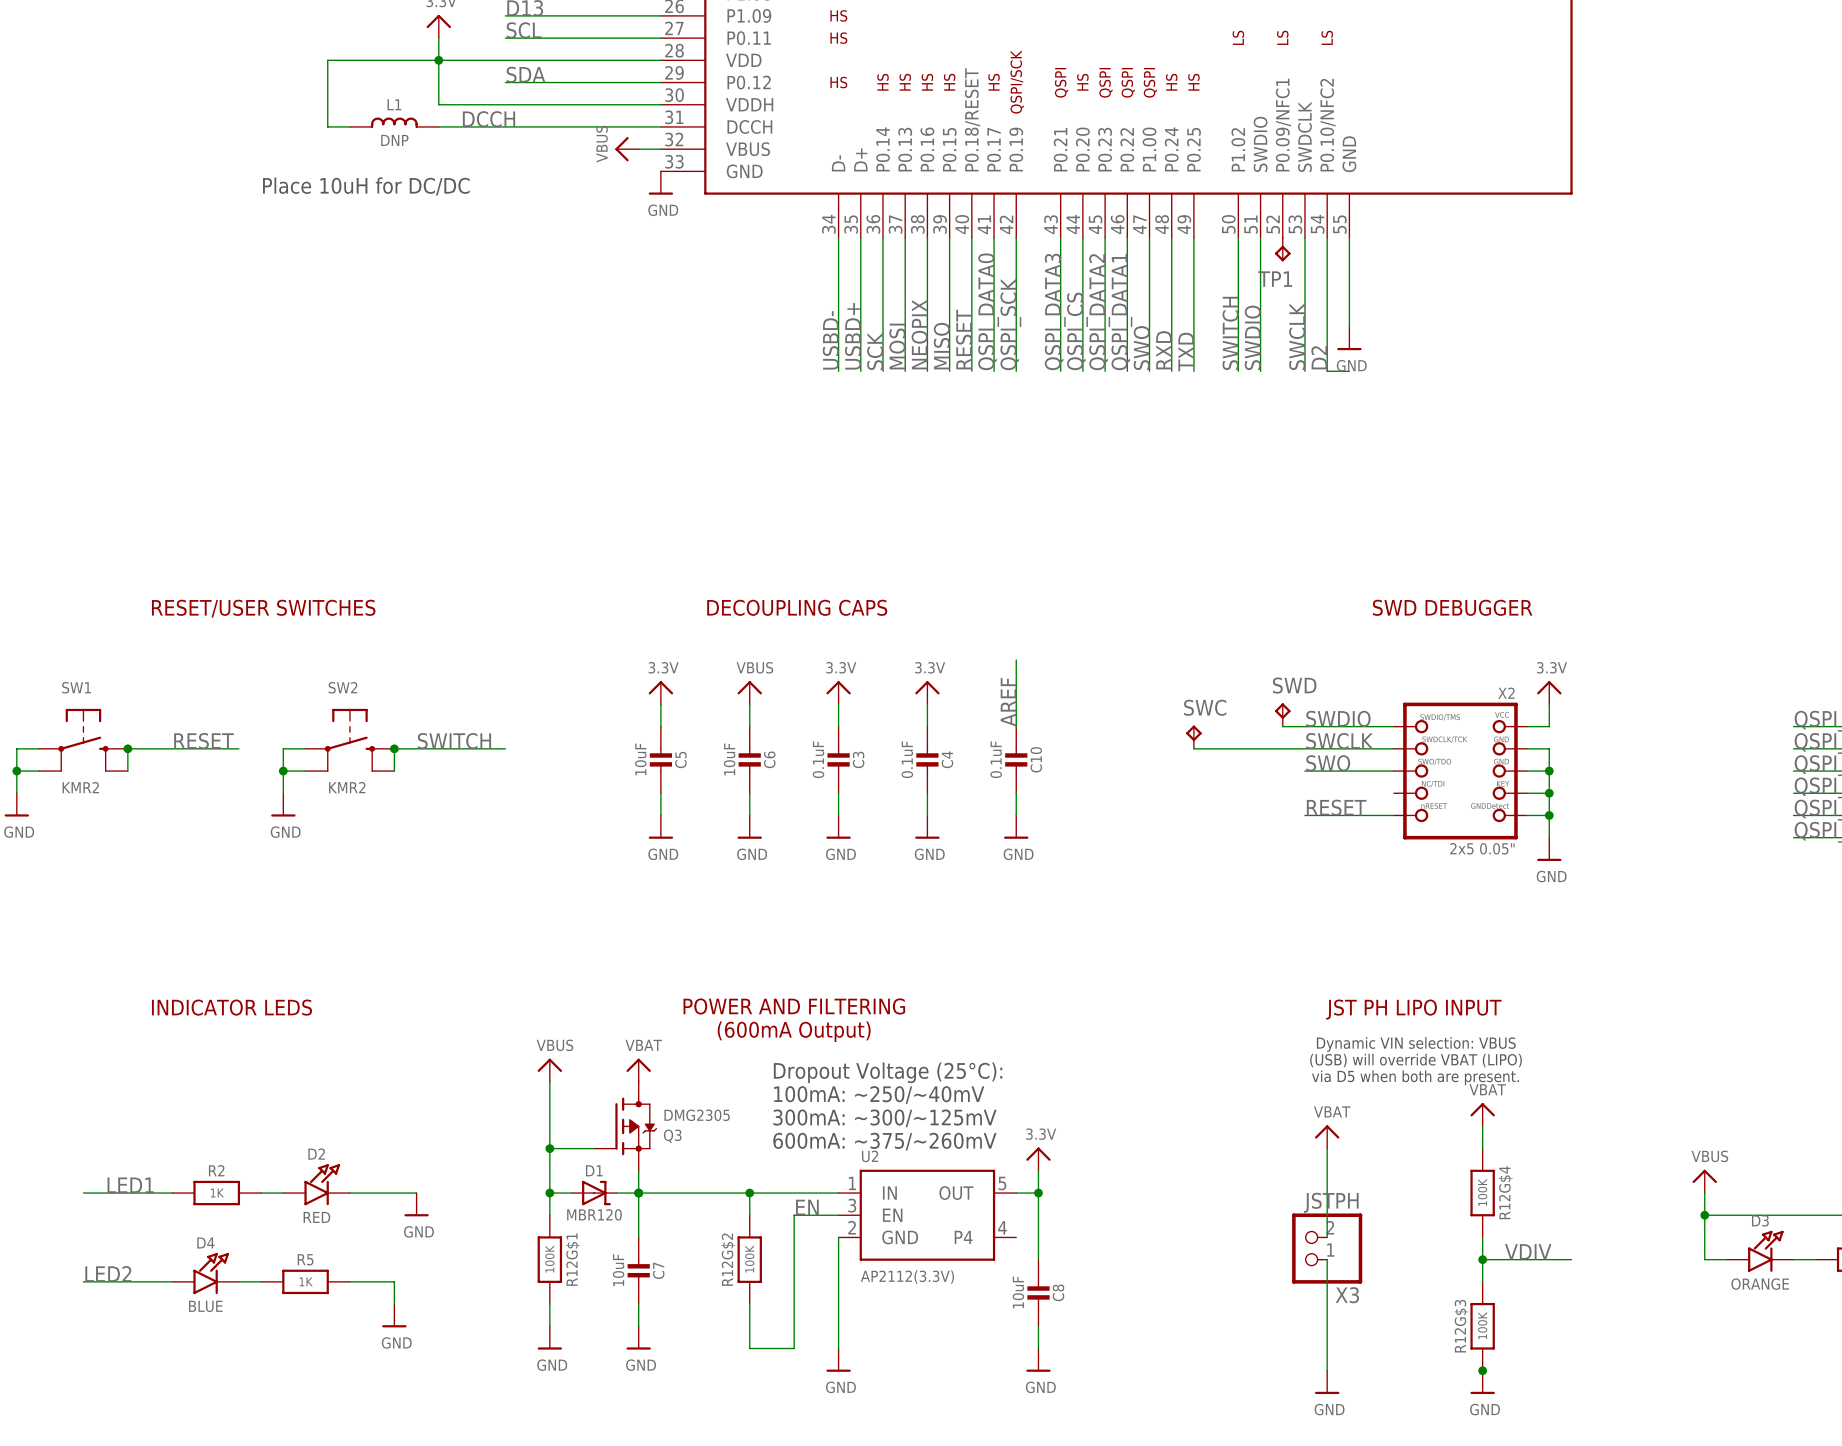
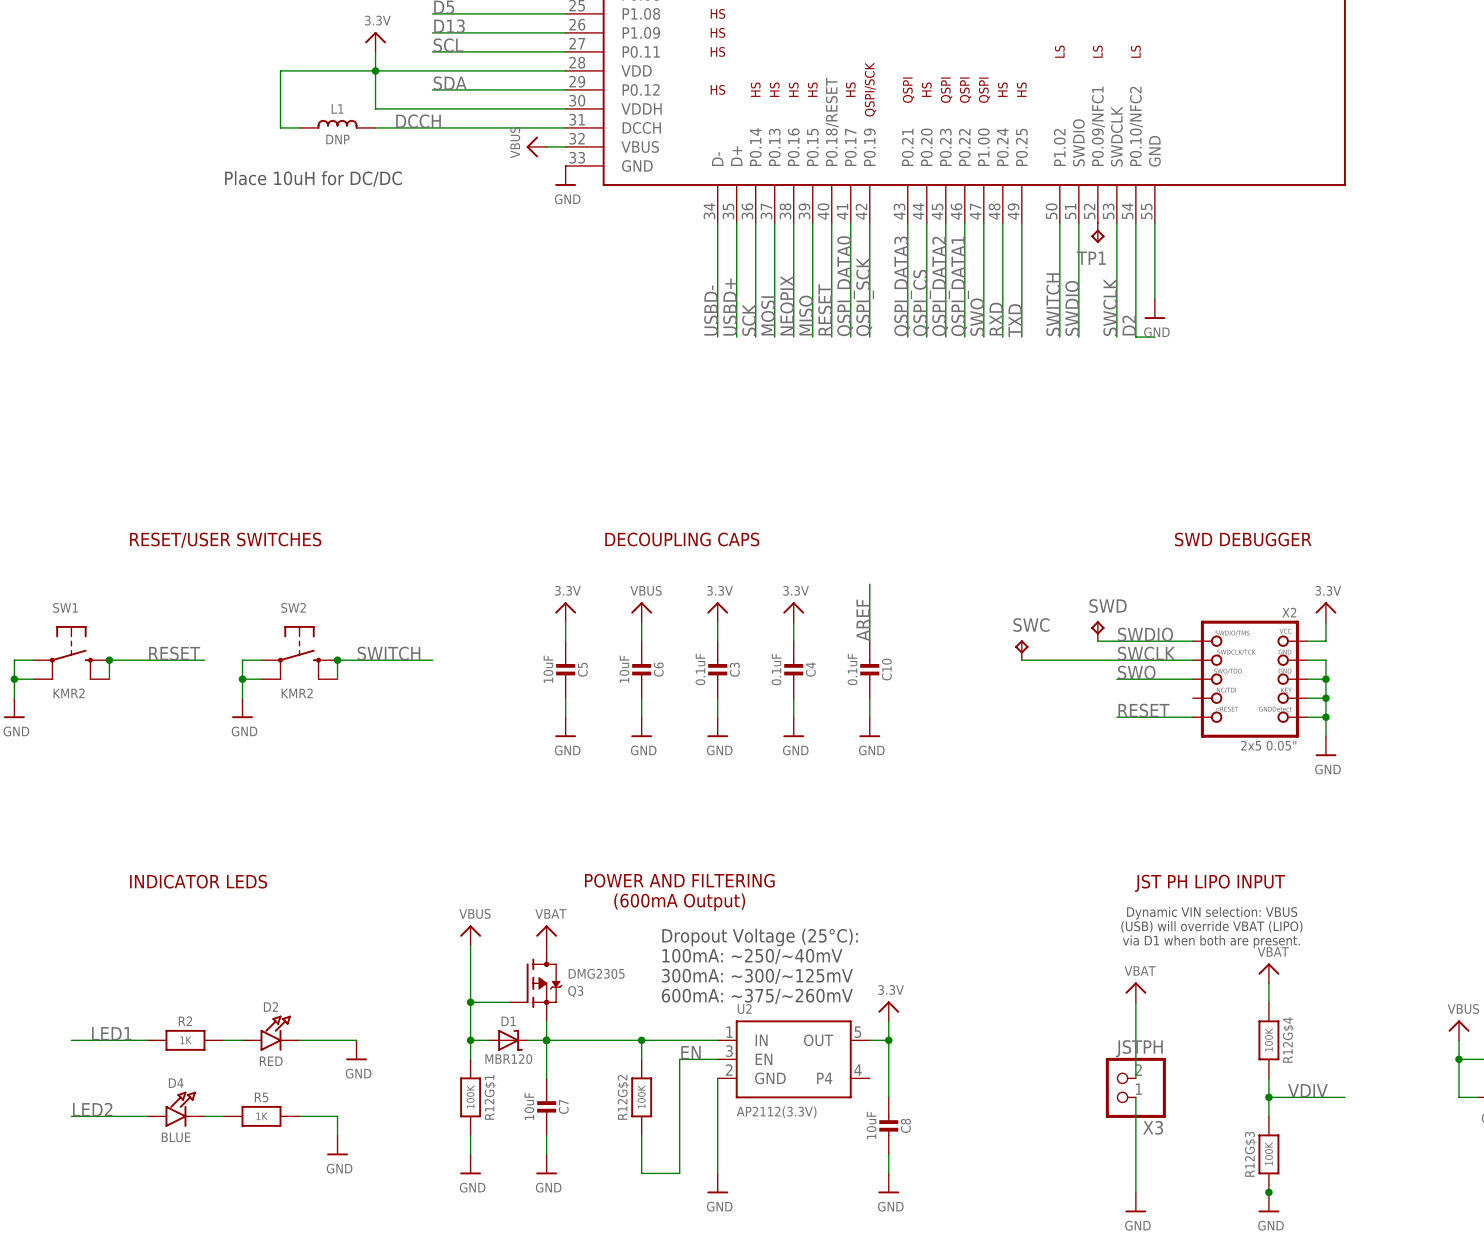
text: via D5 when both are present. (1415, 1077) -> via D1 when both are present. (1211, 941)

